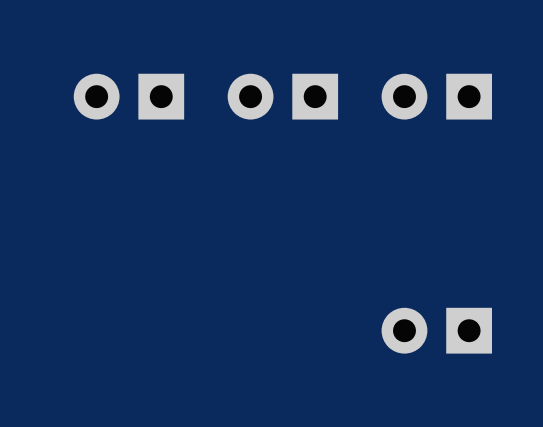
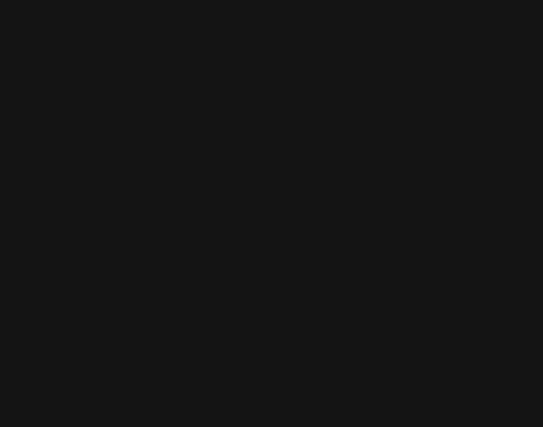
part: (128, 96) -> none
part: (282, 96) -> none
part: (436, 96) -> none
part: (436, 330) -> none

